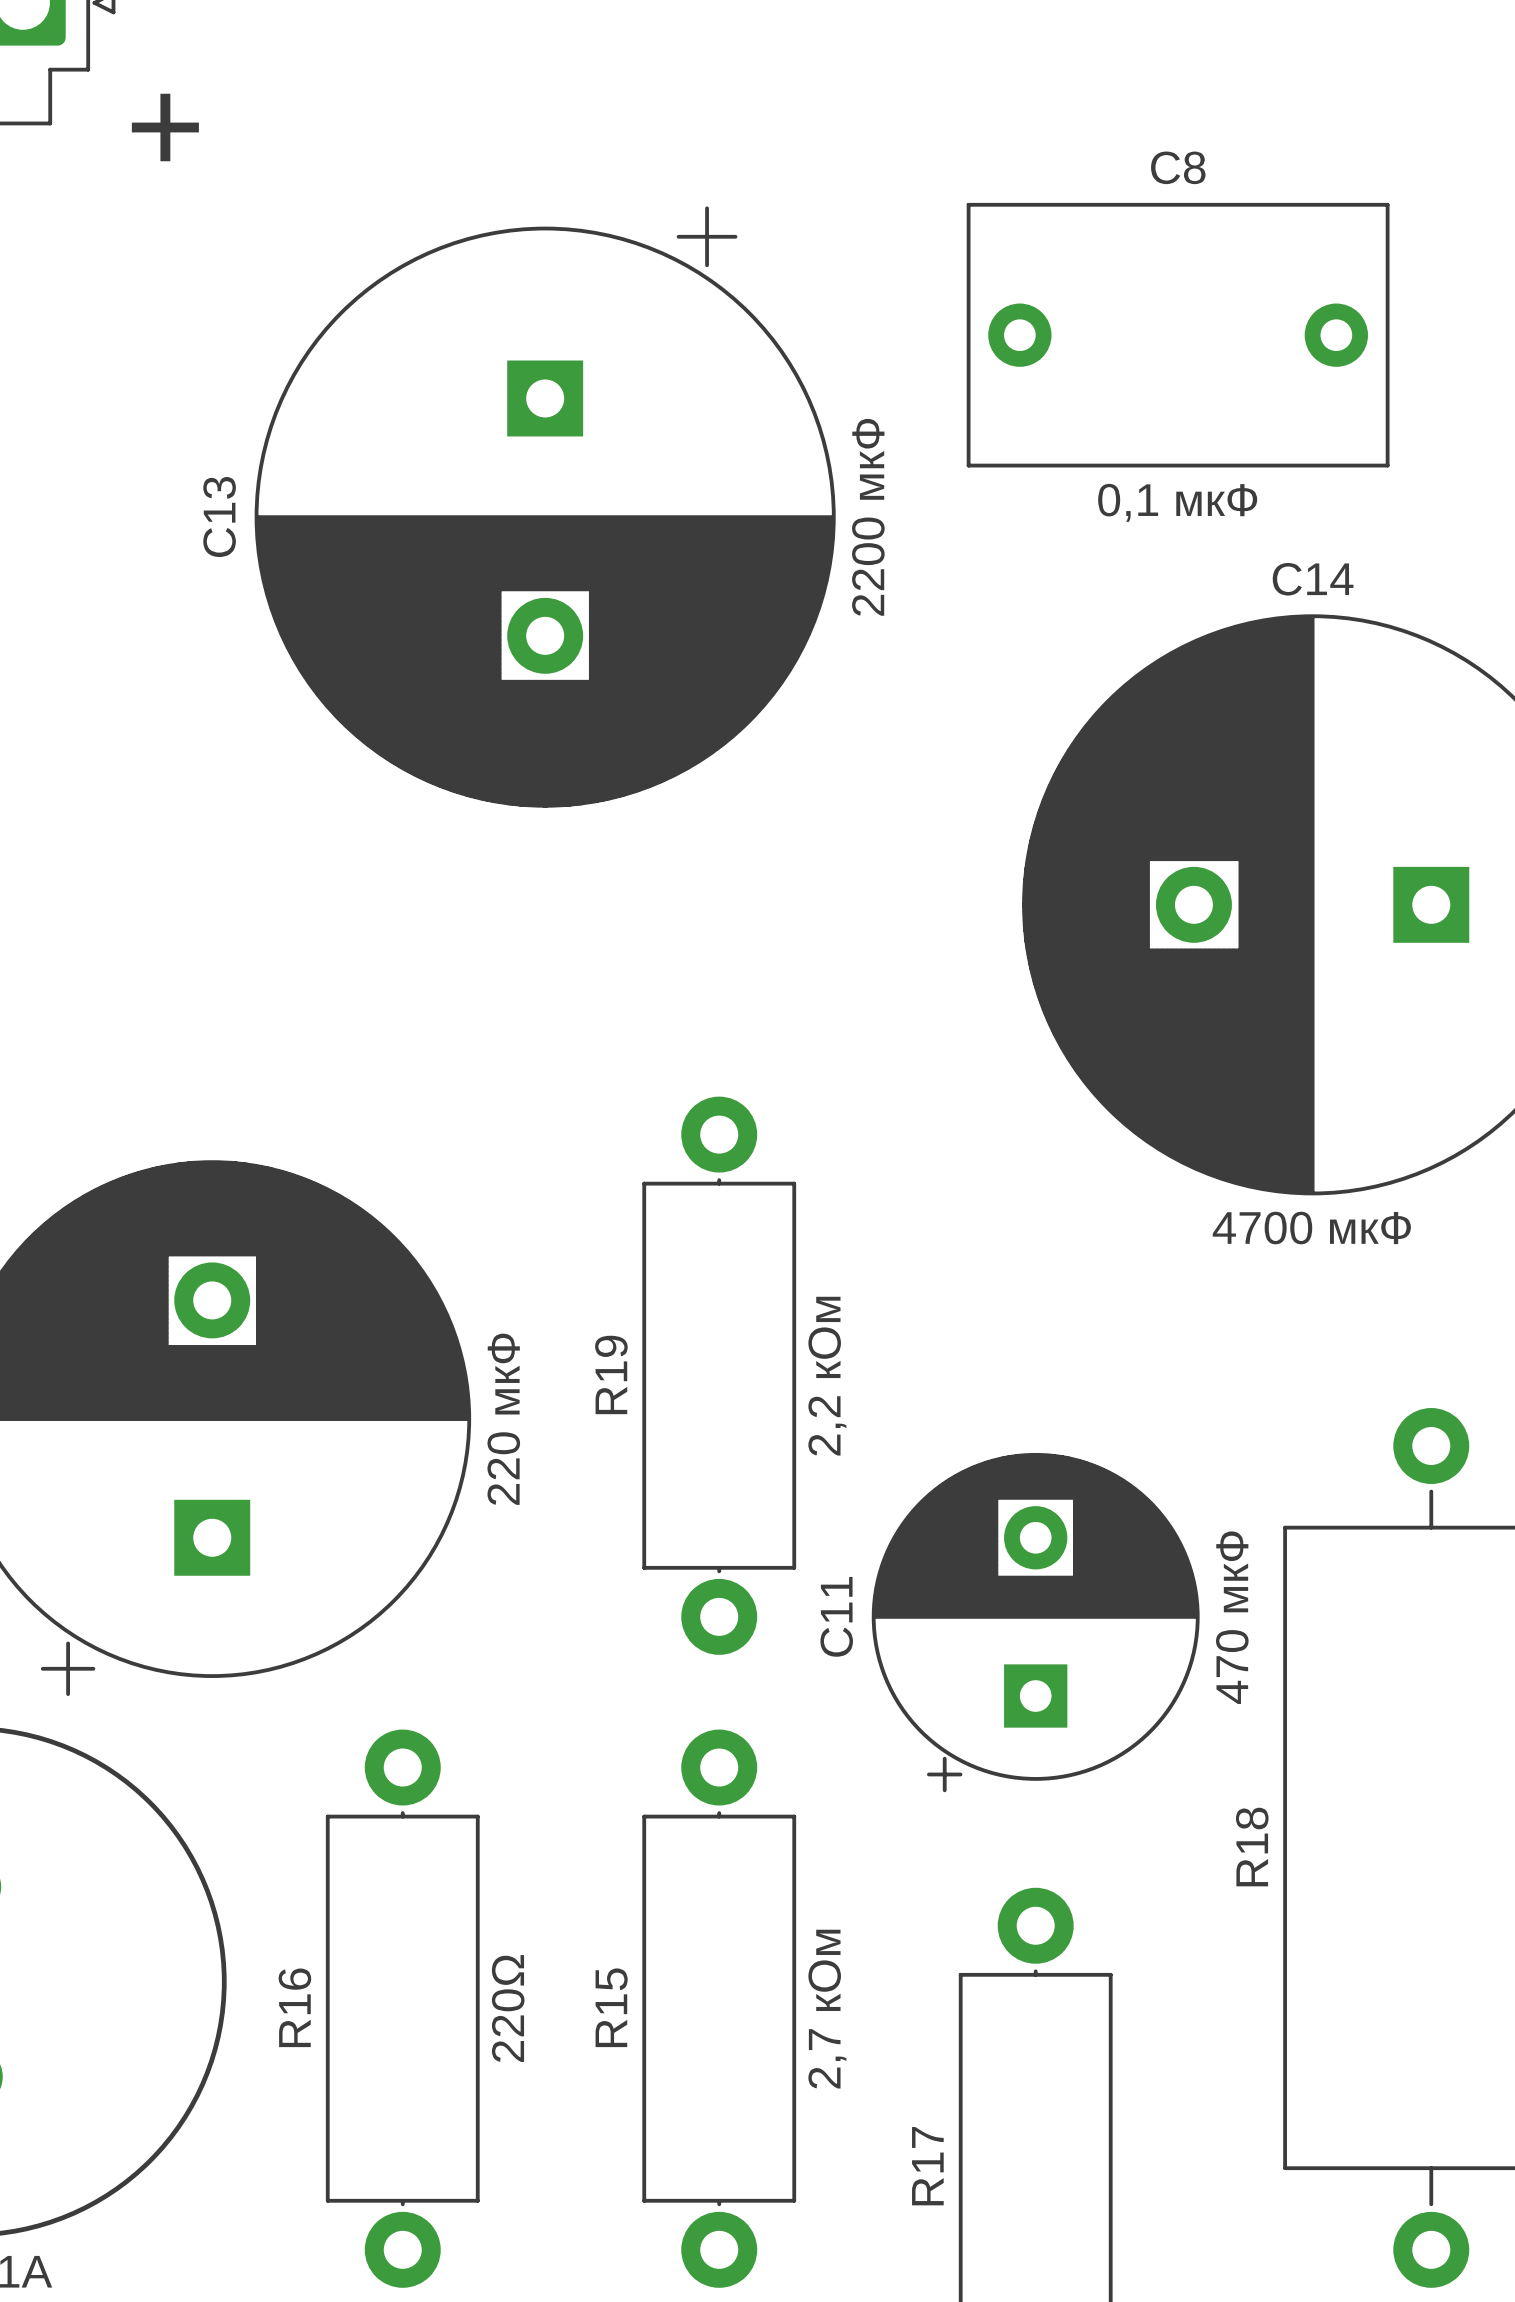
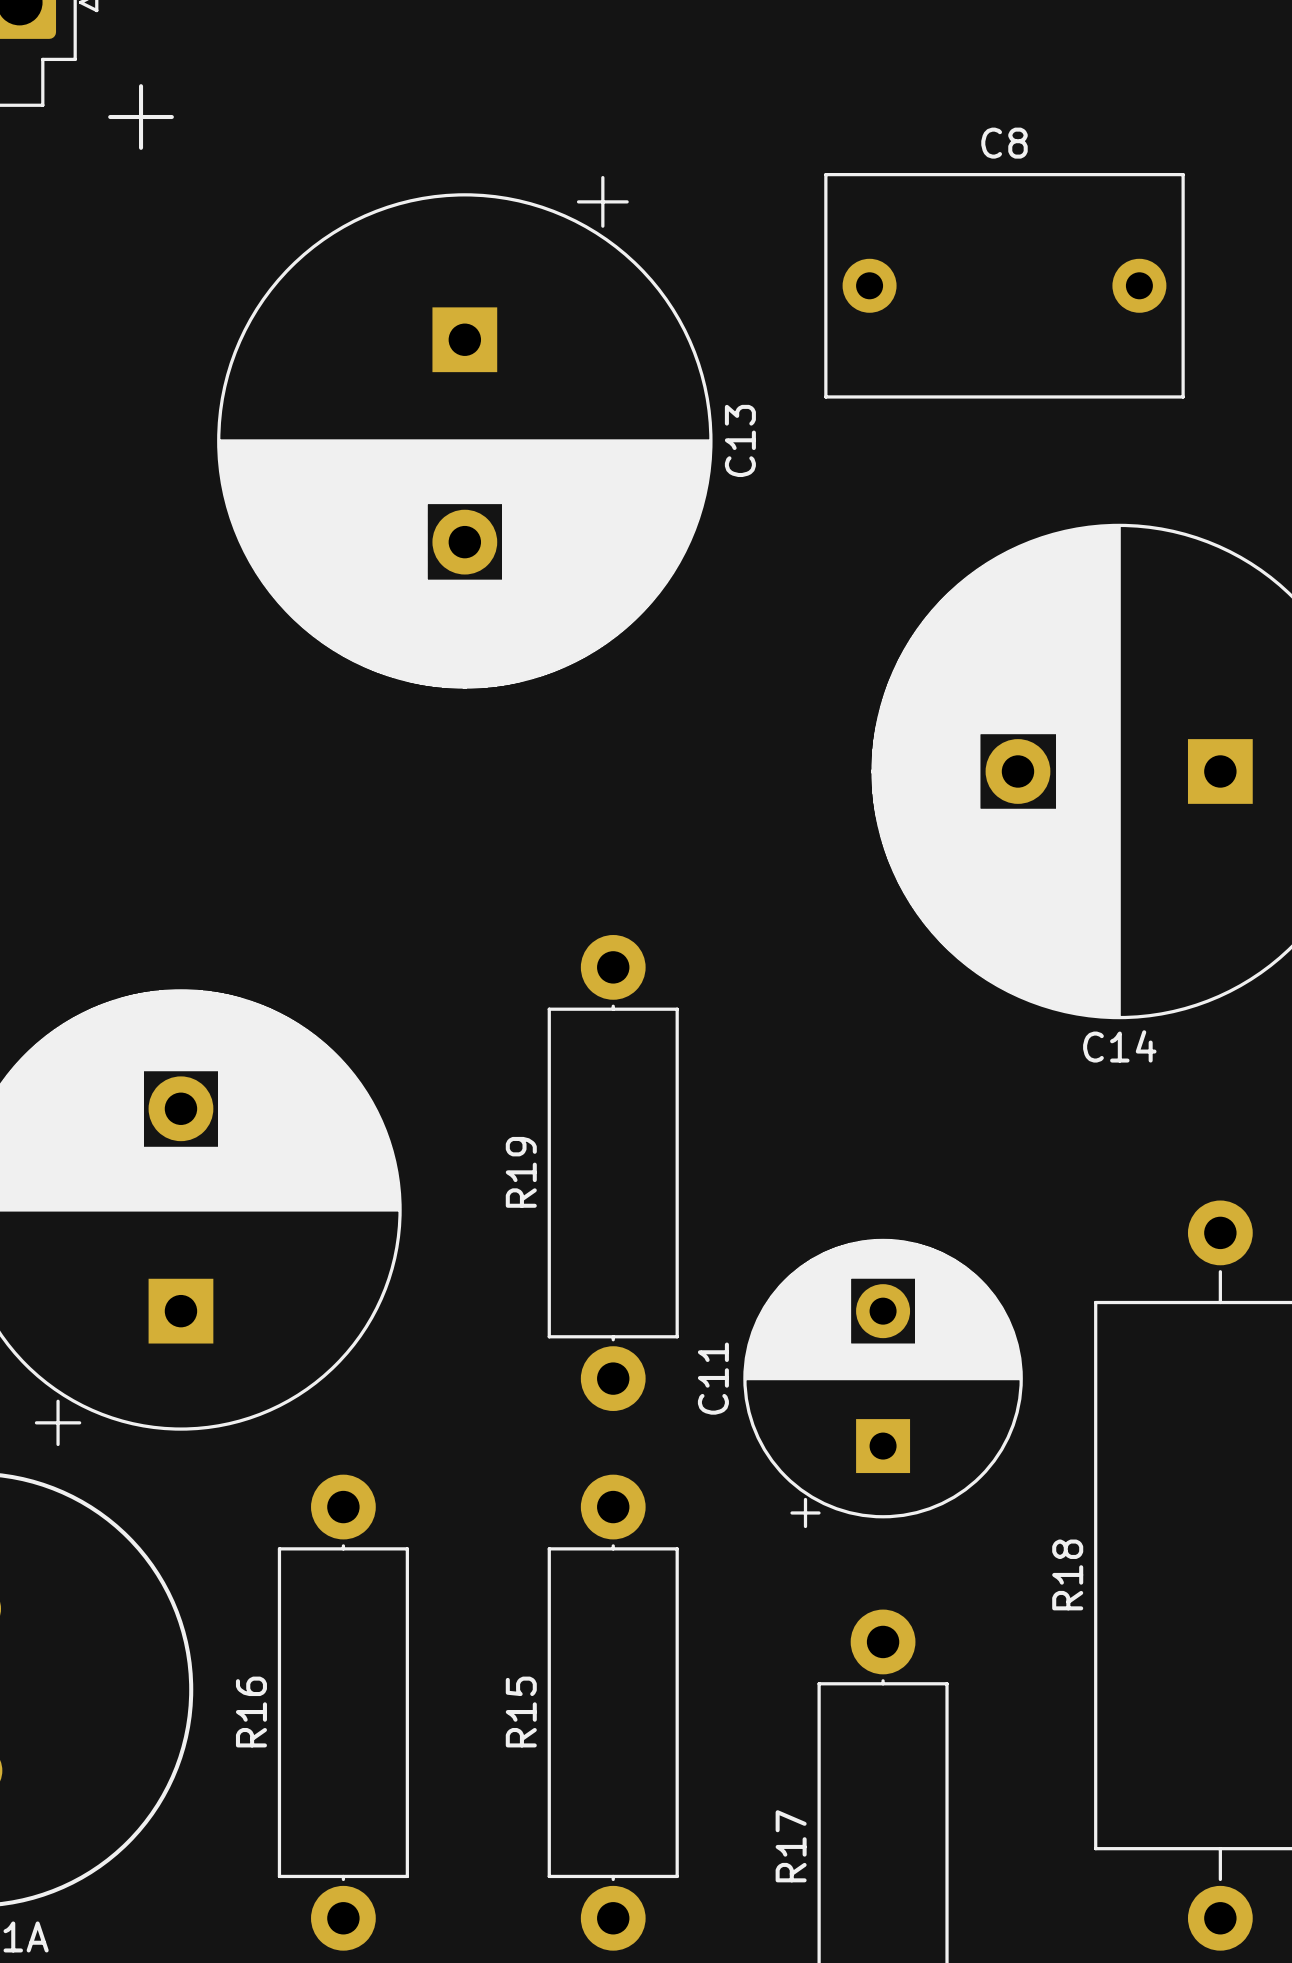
C8 value: 0,1 мкФ (1177, 502) -> none
C13 name position: C13 (219, 517) -> C13 (740, 440)
C13 value: 2200 мкФ (868, 517) -> none
C14 name position: C14 (1313, 579) -> C14 (1119, 1046)
C14 value: 4700 мкФ (1311, 1228) -> none
R19 value: 2,2 кОм (827, 1376) -> none
part value: 220 мкФ (503, 1419) -> none
C11 value: 470 мкФ (1232, 1617) -> none
R16 value: 220Ω (508, 2008) -> none
R15 value: 2,7 кОм (827, 2009) -> none

